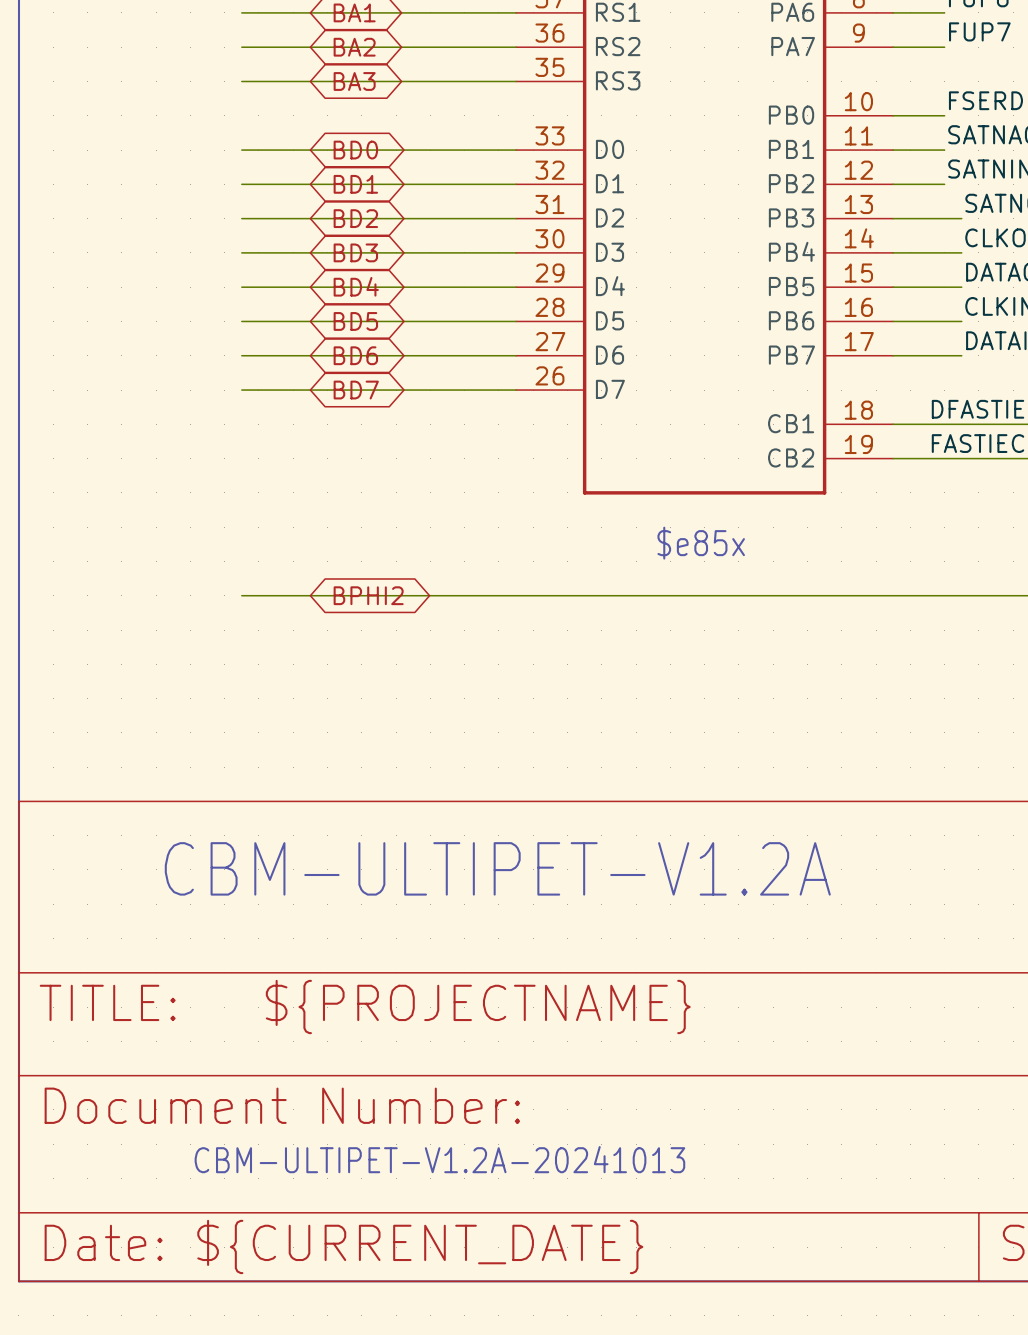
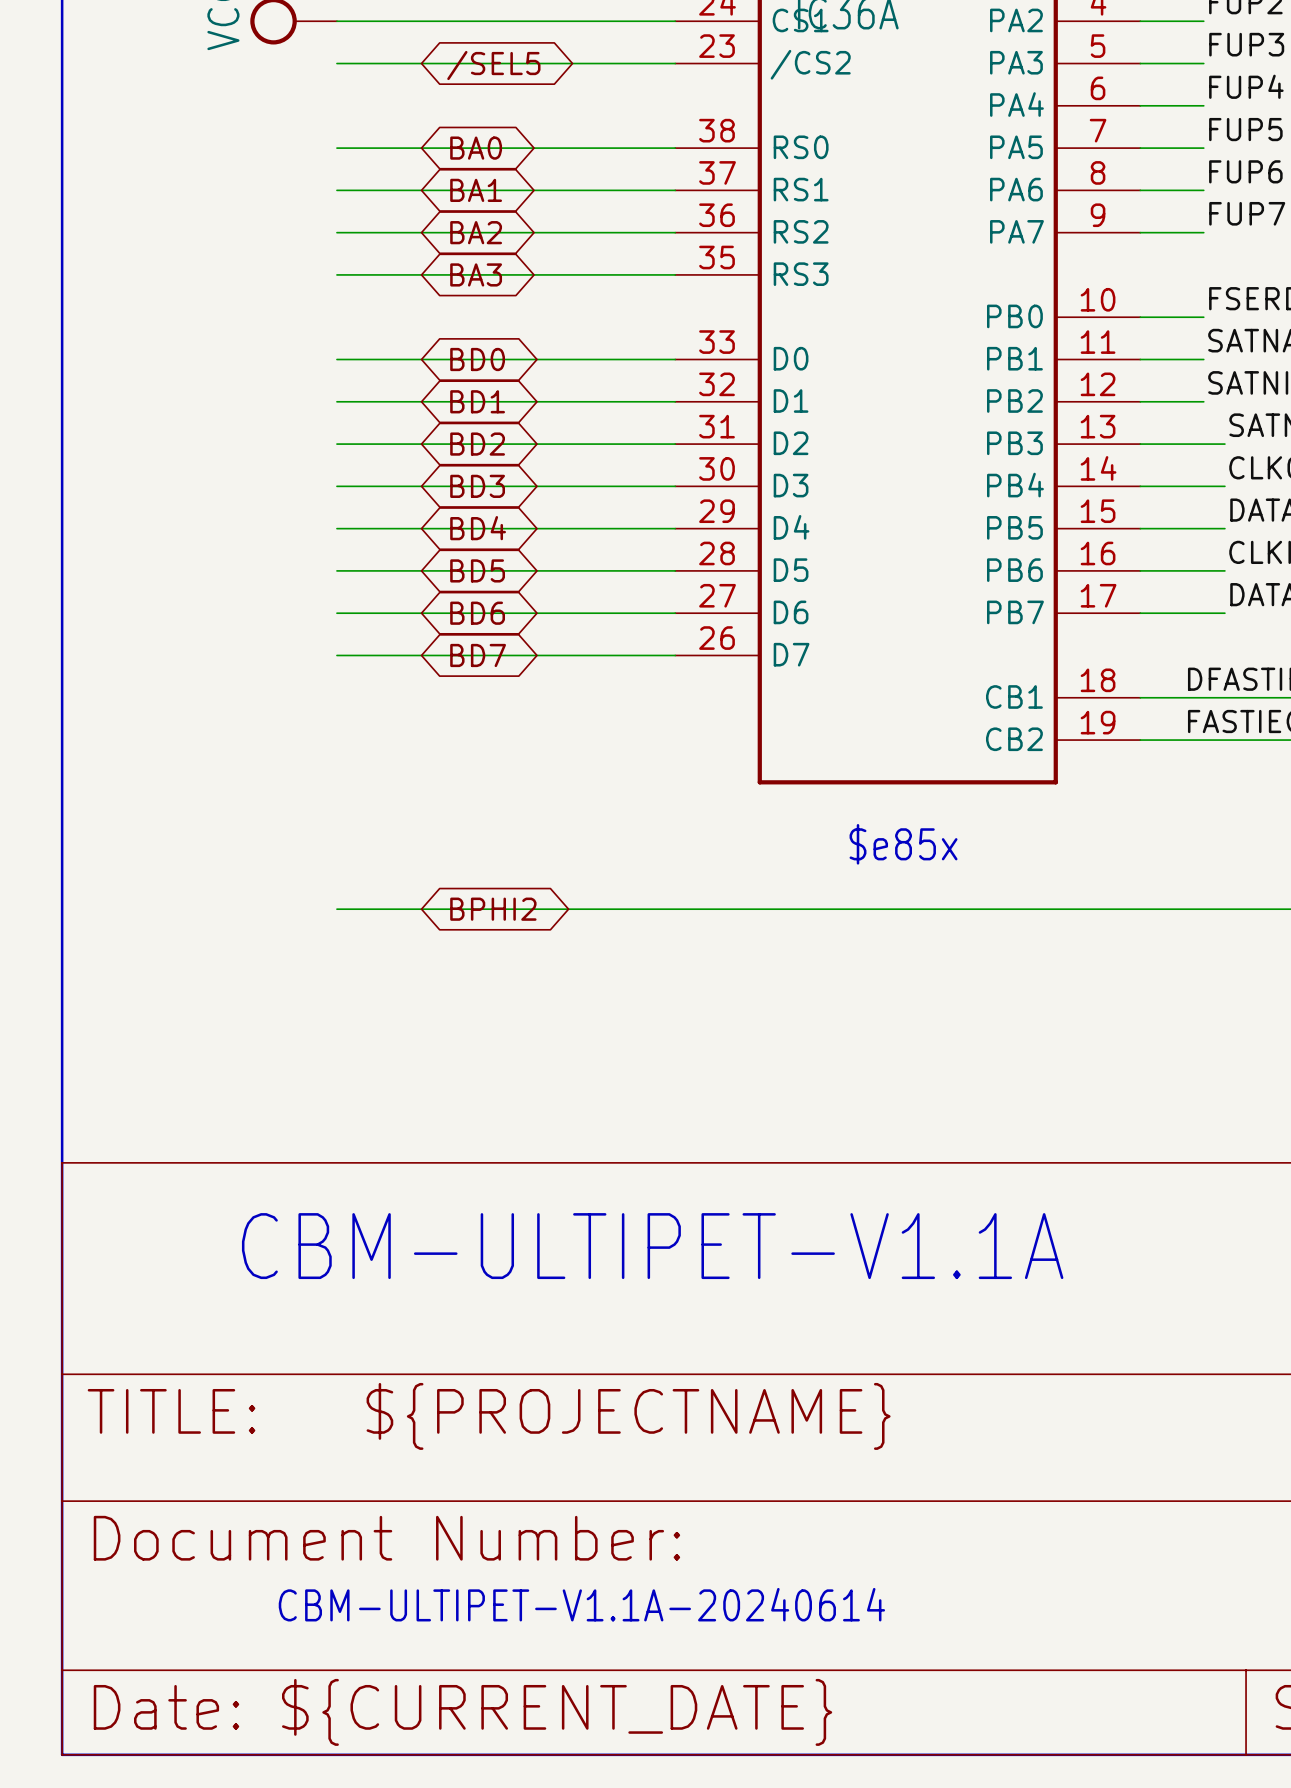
text: CBM-ULTIPET-V1.2A (497, 868) -> CBM-ULTIPET-V1.1A (652, 1246)
text: CBM-ULTIPET-V1.2A-20241013 (439, 1159) -> CBM-ULTIPET-V1.1A-20240614 (581, 1604)

